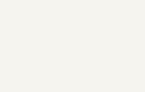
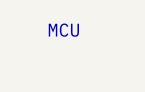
text: none -> MCU (63, 30)

